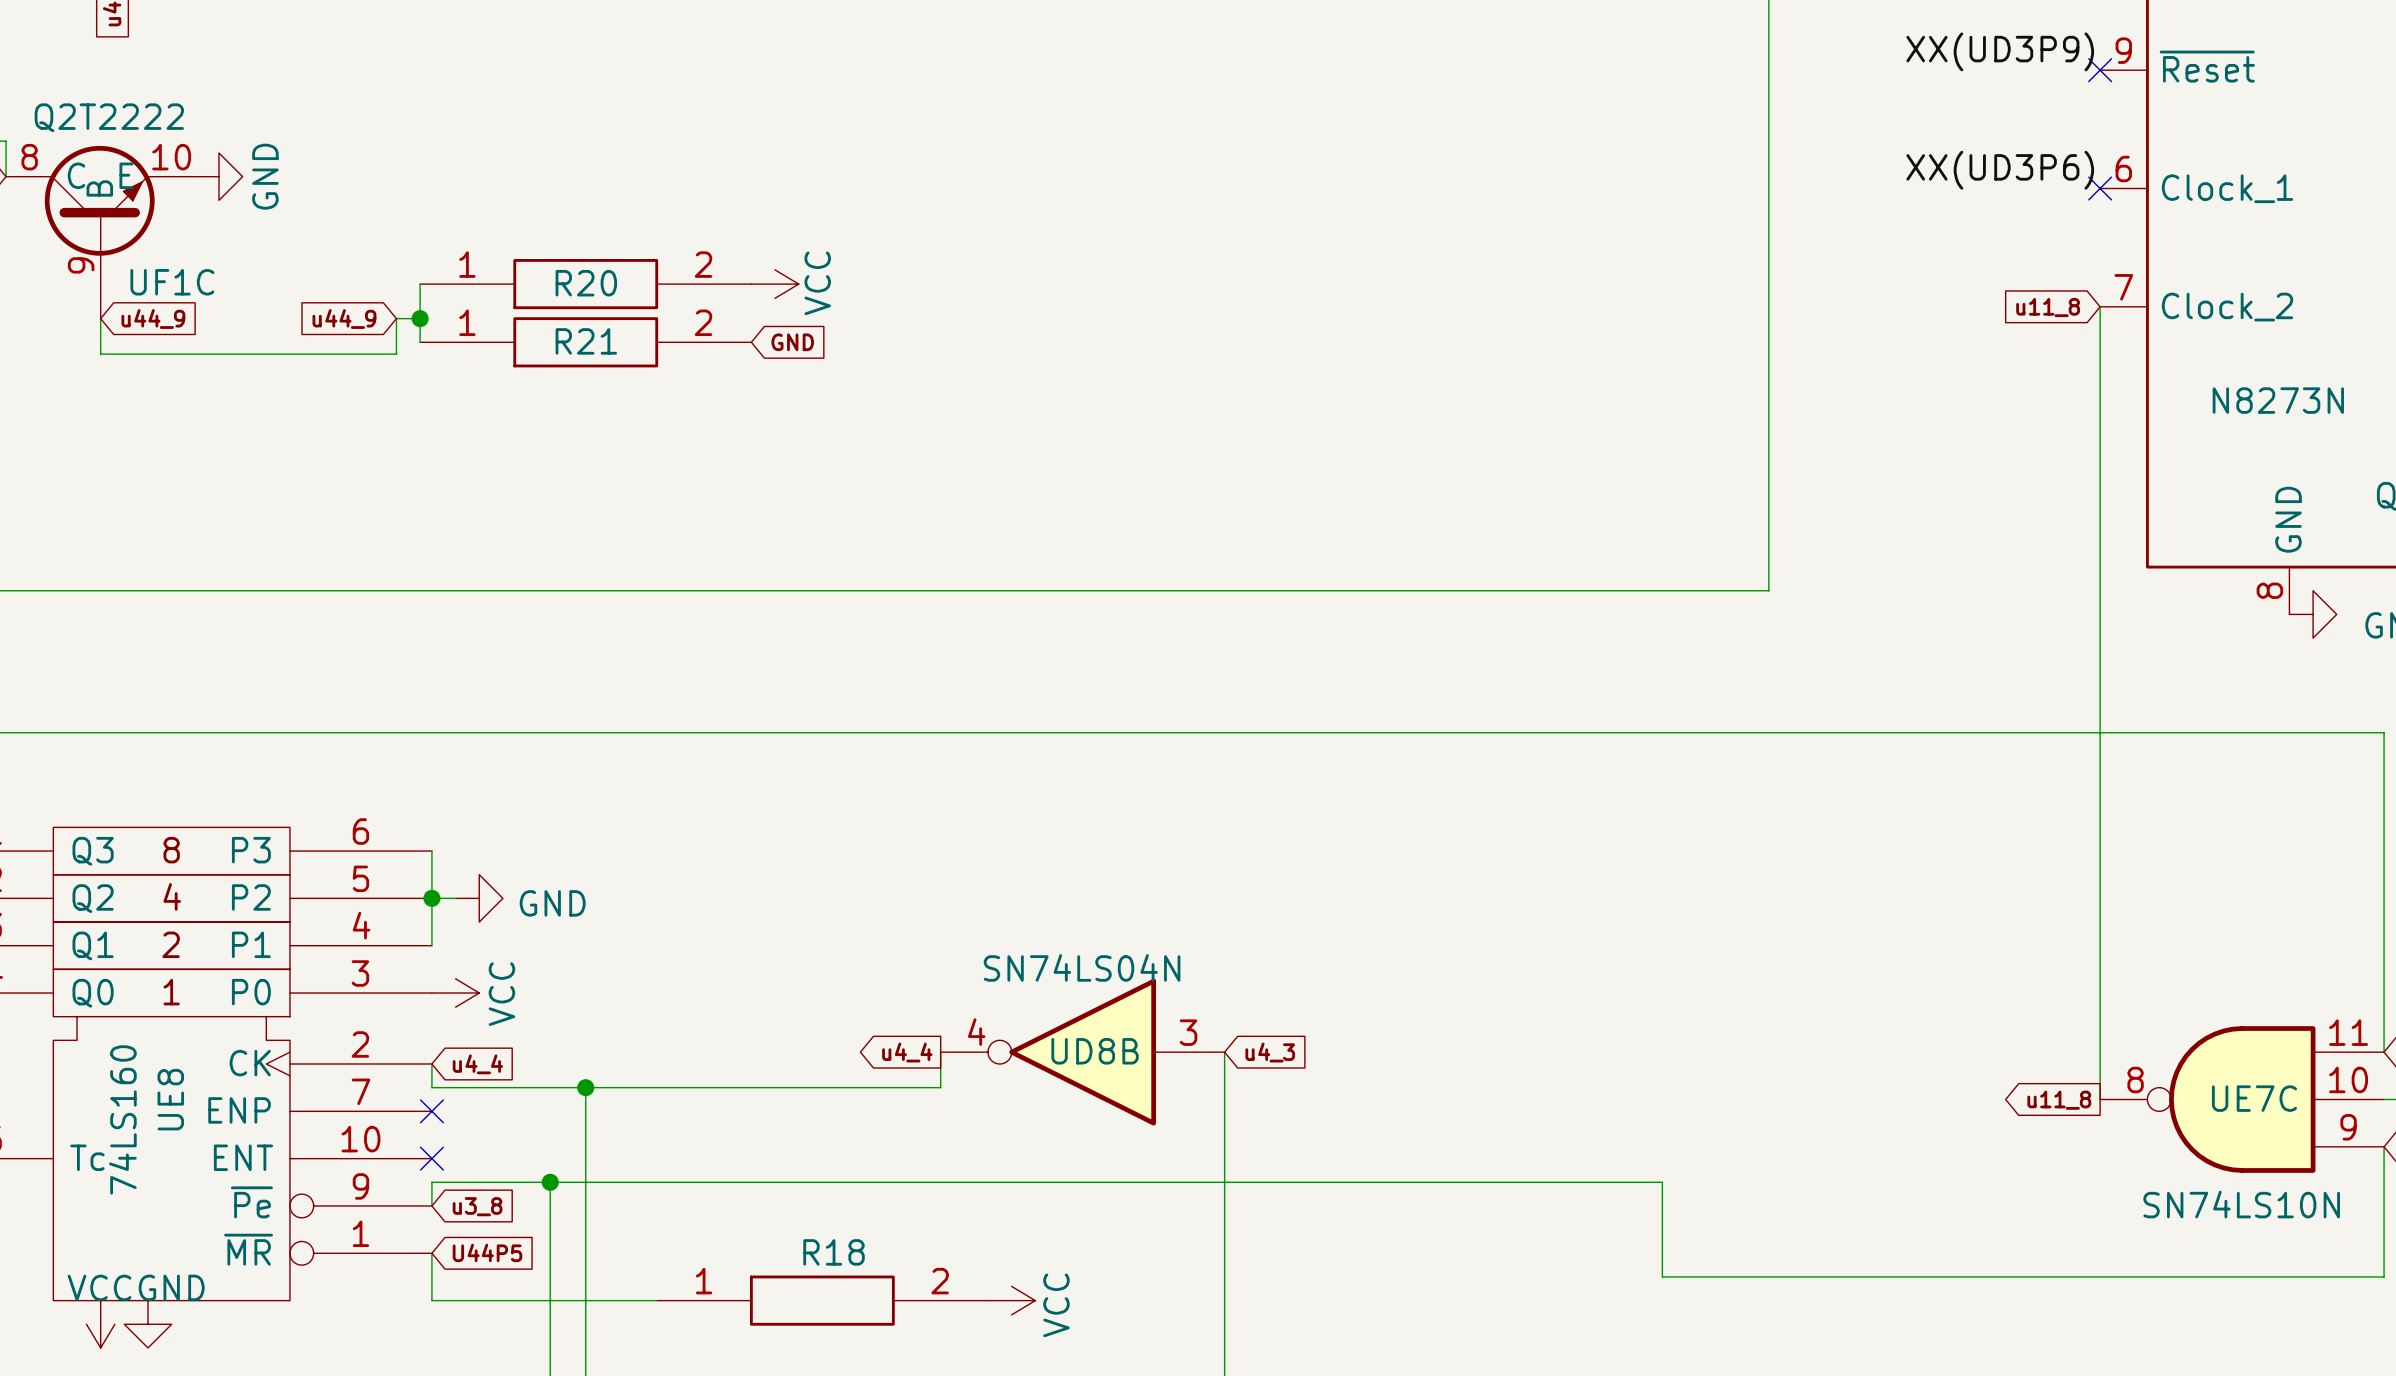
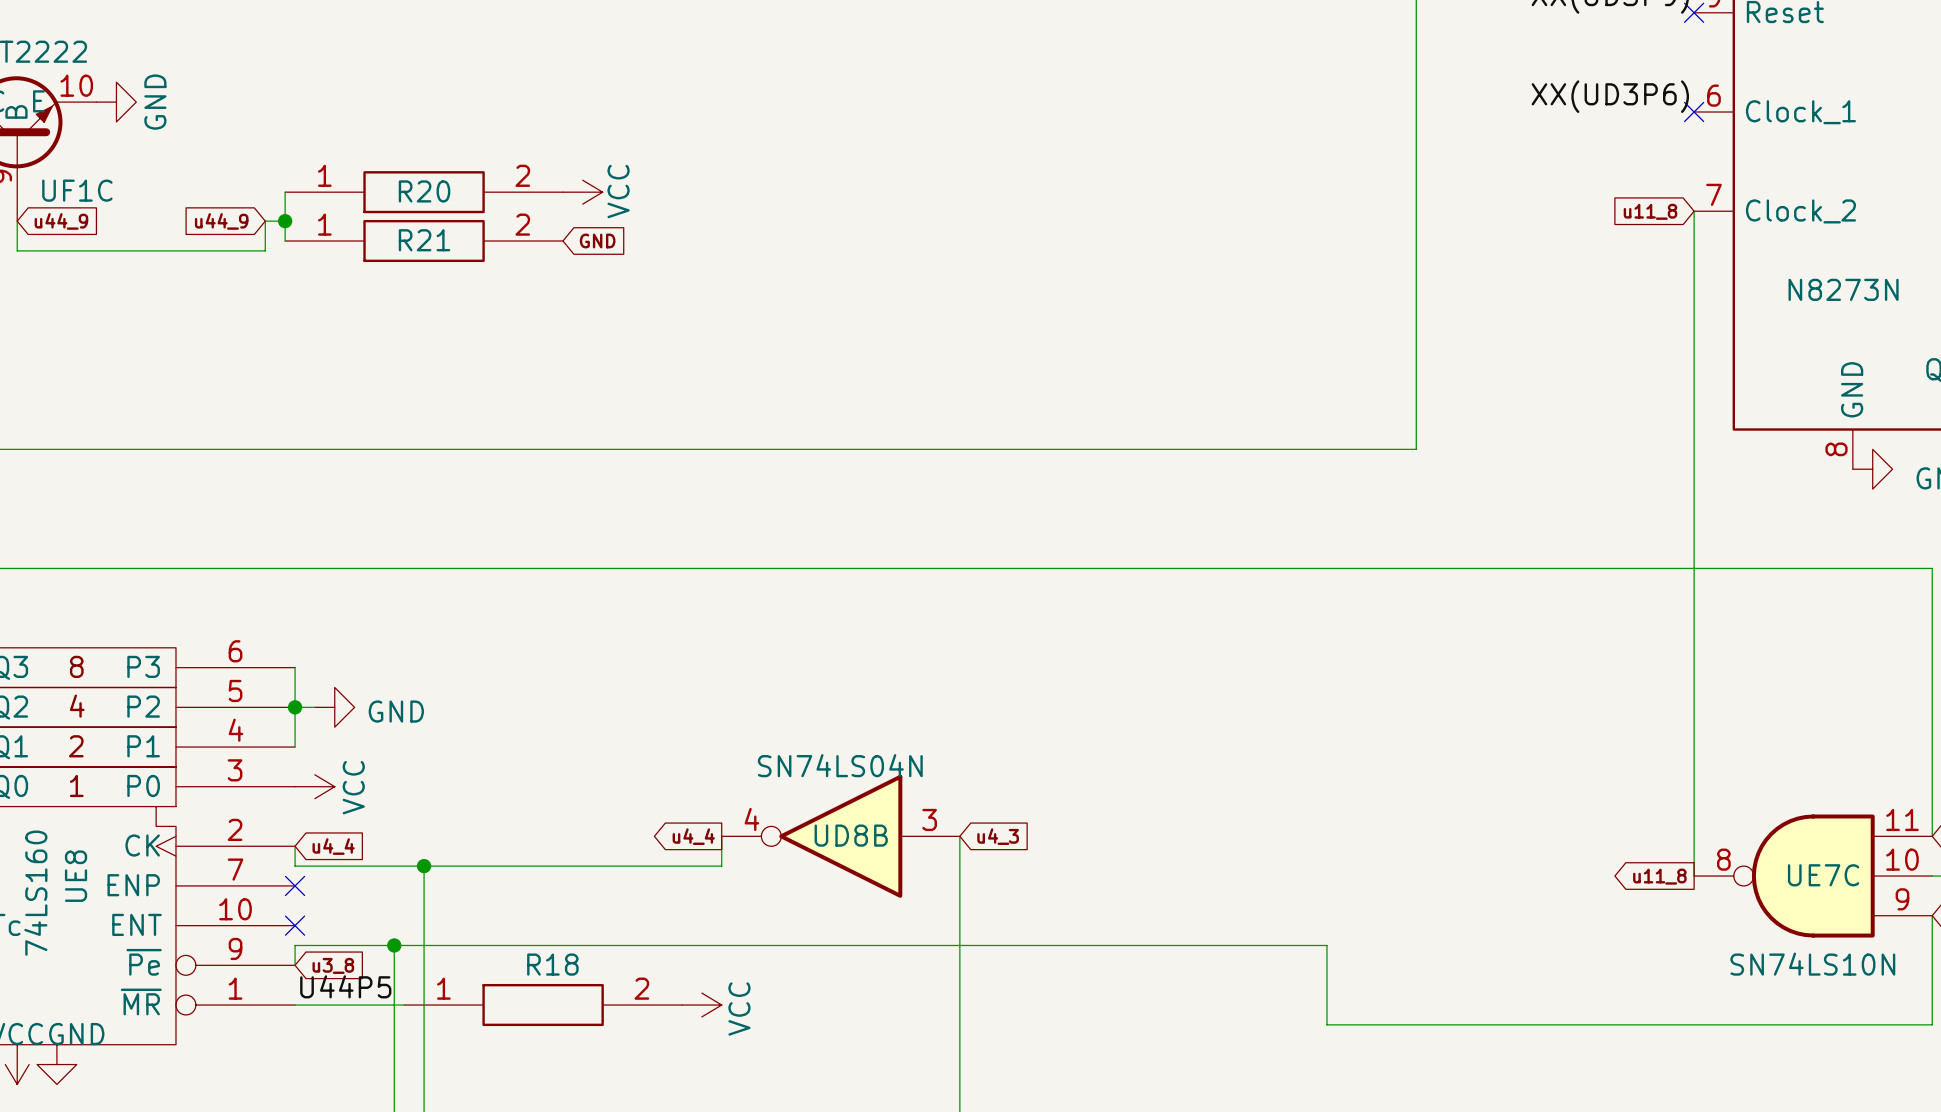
label: none -> U44P5 (345, 986)
global label: U44P5 (487, 1252) -> none
wire: (431, 1253) (431, 1300) (656, 1300) -> (295, 1005) (404, 1005)
R18 position: (822, 1300) -> (543, 1005)
power symbol position: VCC (1011, 1300) -> VCC (701, 1005)

